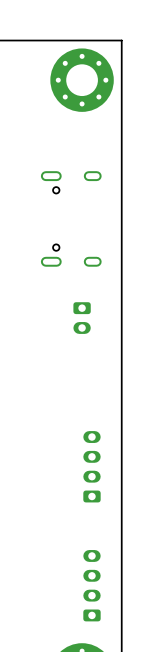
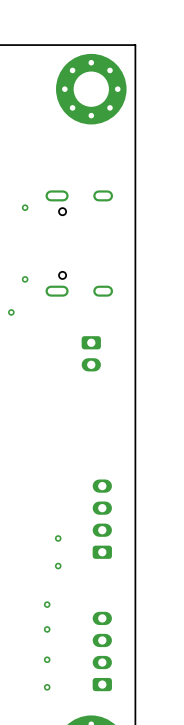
via: none -> (25, 207)
via: none -> (25, 279)
via: none -> (11, 312)
via: none -> (58, 538)
via: none -> (58, 566)
via: none -> (47, 604)
via: none -> (47, 629)
via: none -> (47, 659)
via: none -> (47, 687)

